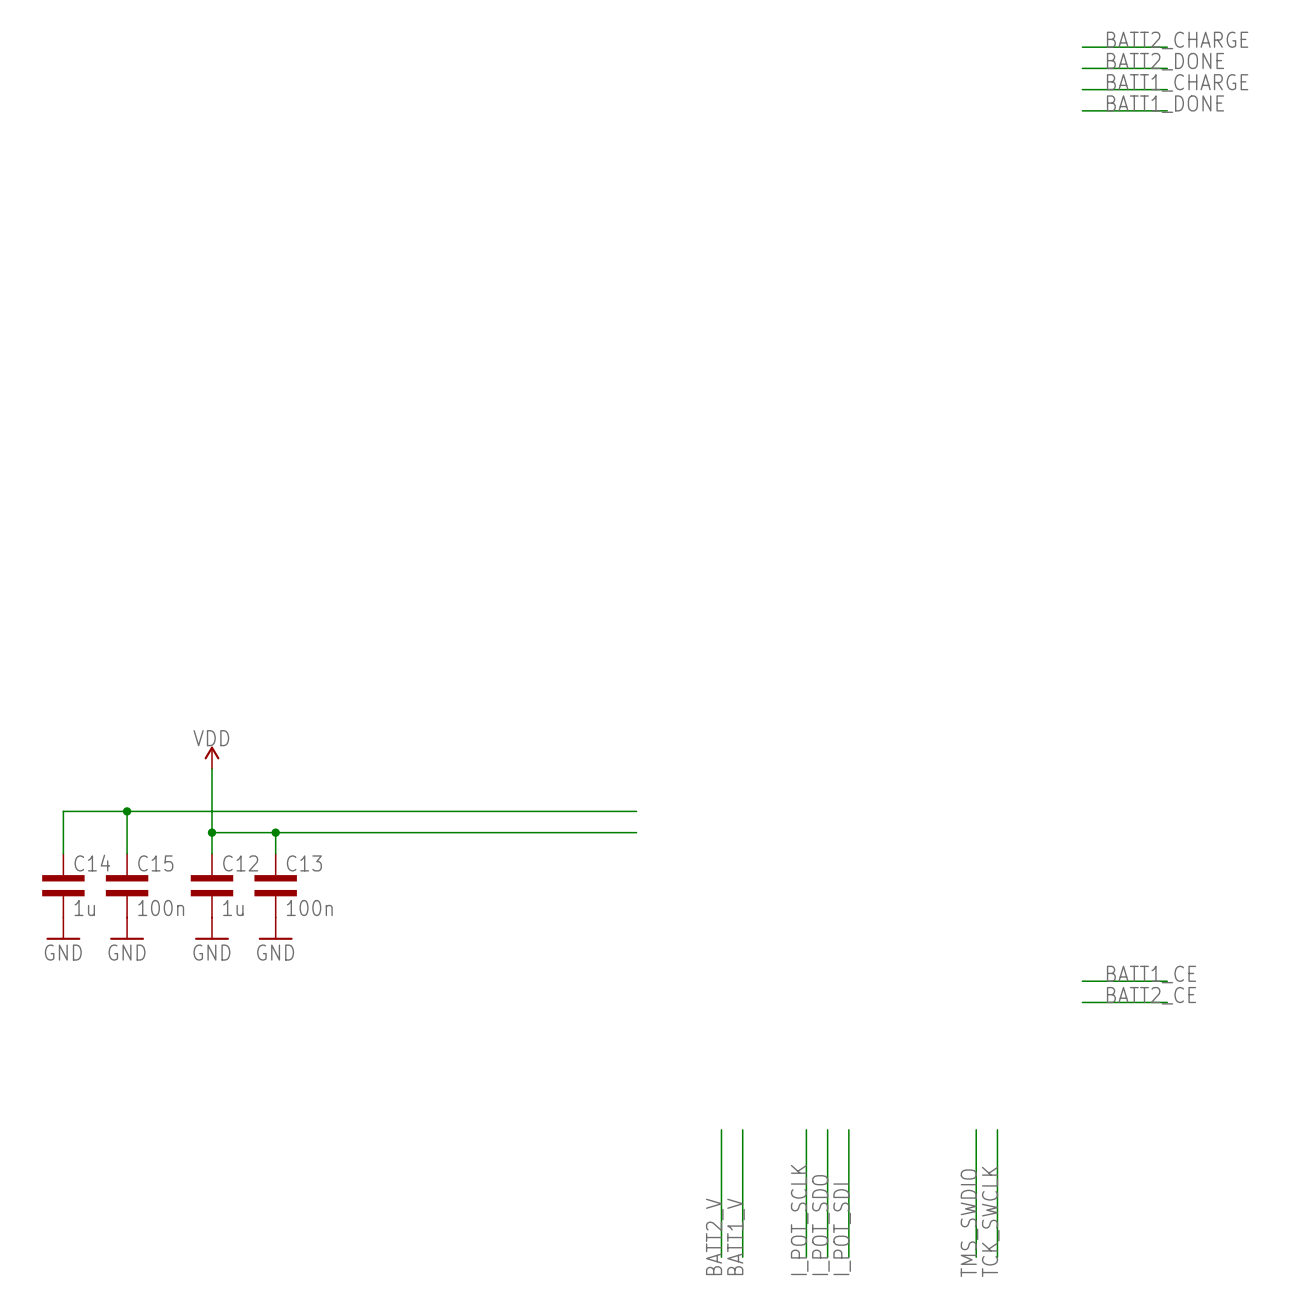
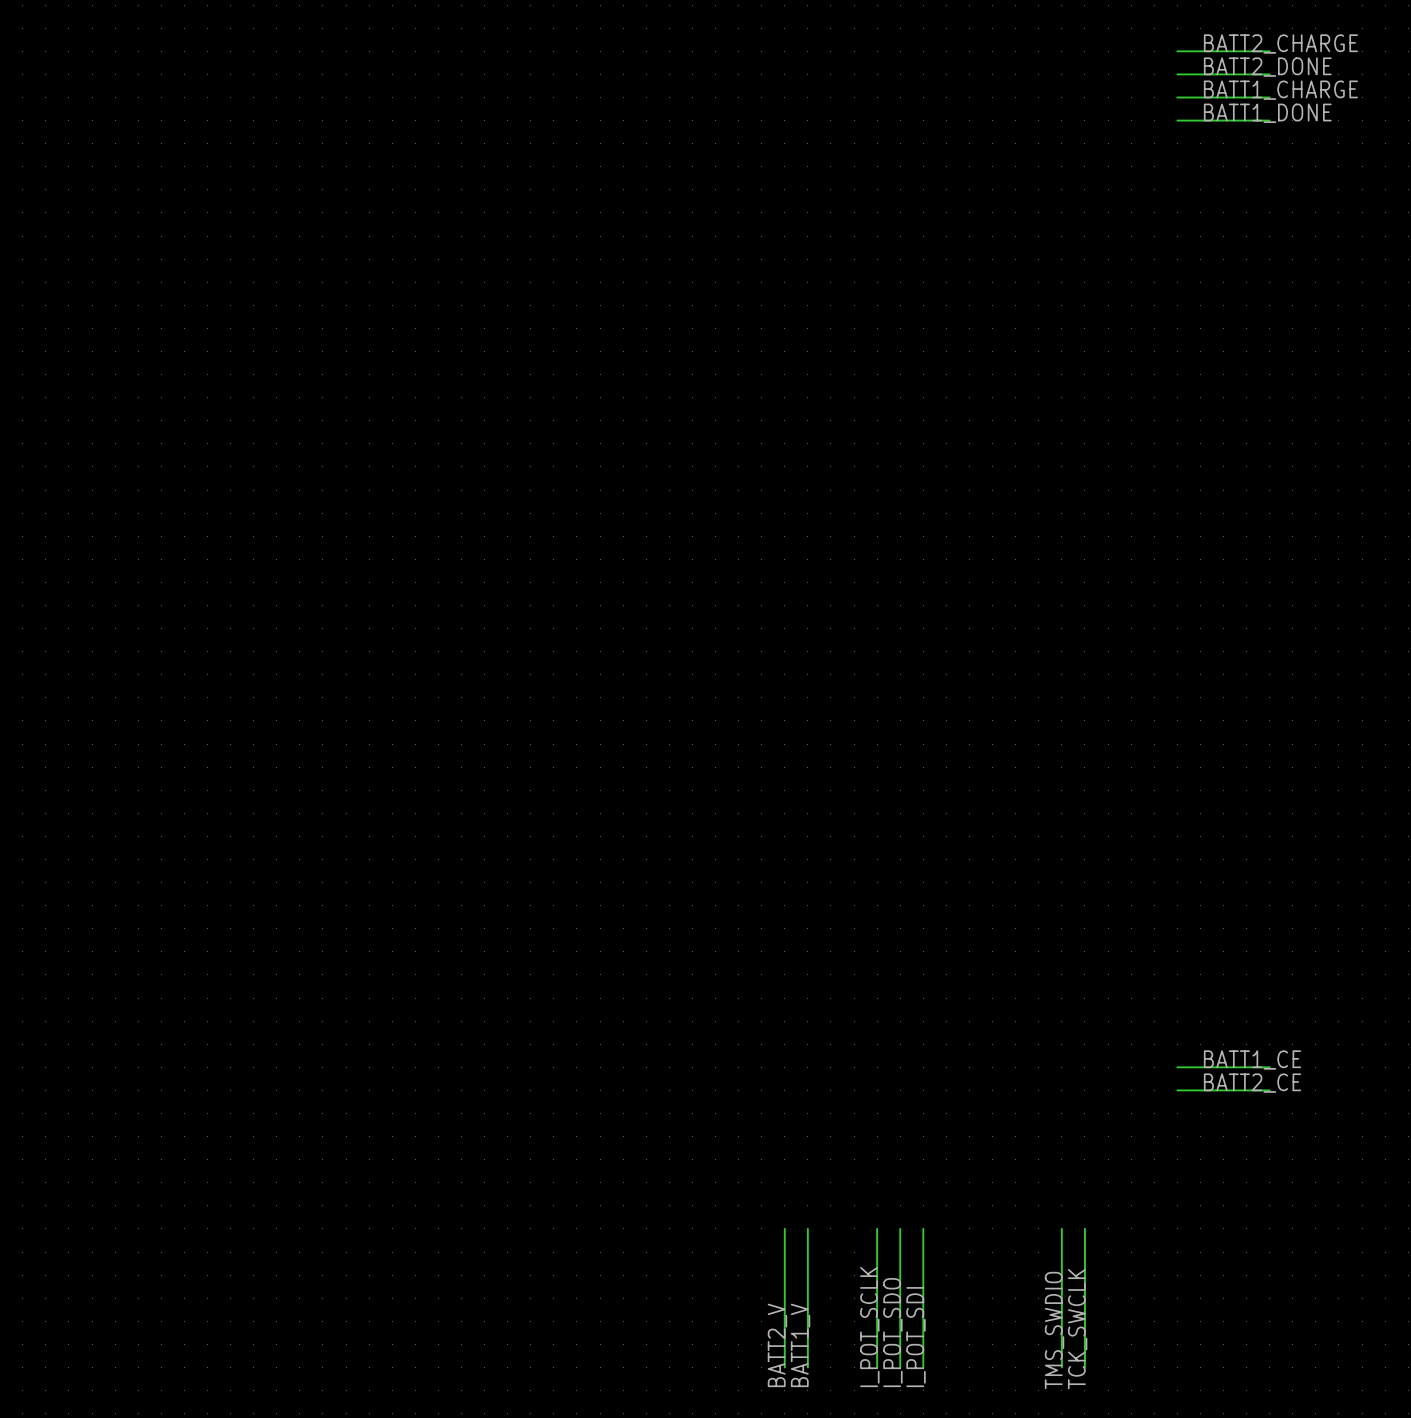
power symbol: VDD (211, 757) -> none
wire: (211, 768) (211, 853) -> none
wire: (127, 811) (127, 853) -> none
junction: (127, 811) -> none
wire: (636, 811) (63, 811) (63, 853) -> none
wire: (211, 832) (636, 832) -> none
junction: (211, 832) -> none
wire: (275, 832) (275, 853) -> none
junction: (275, 832) -> none
C14: 1u (63, 885) -> none
C15: 100n (127, 885) -> none
C12: 1u (211, 885) -> none
C13: 100n (275, 885) -> none
power symbol: GND (63, 928) -> none
power symbol: GND (127, 928) -> none
power symbol: GND (211, 928) -> none
power symbol: GND (275, 928) -> none

